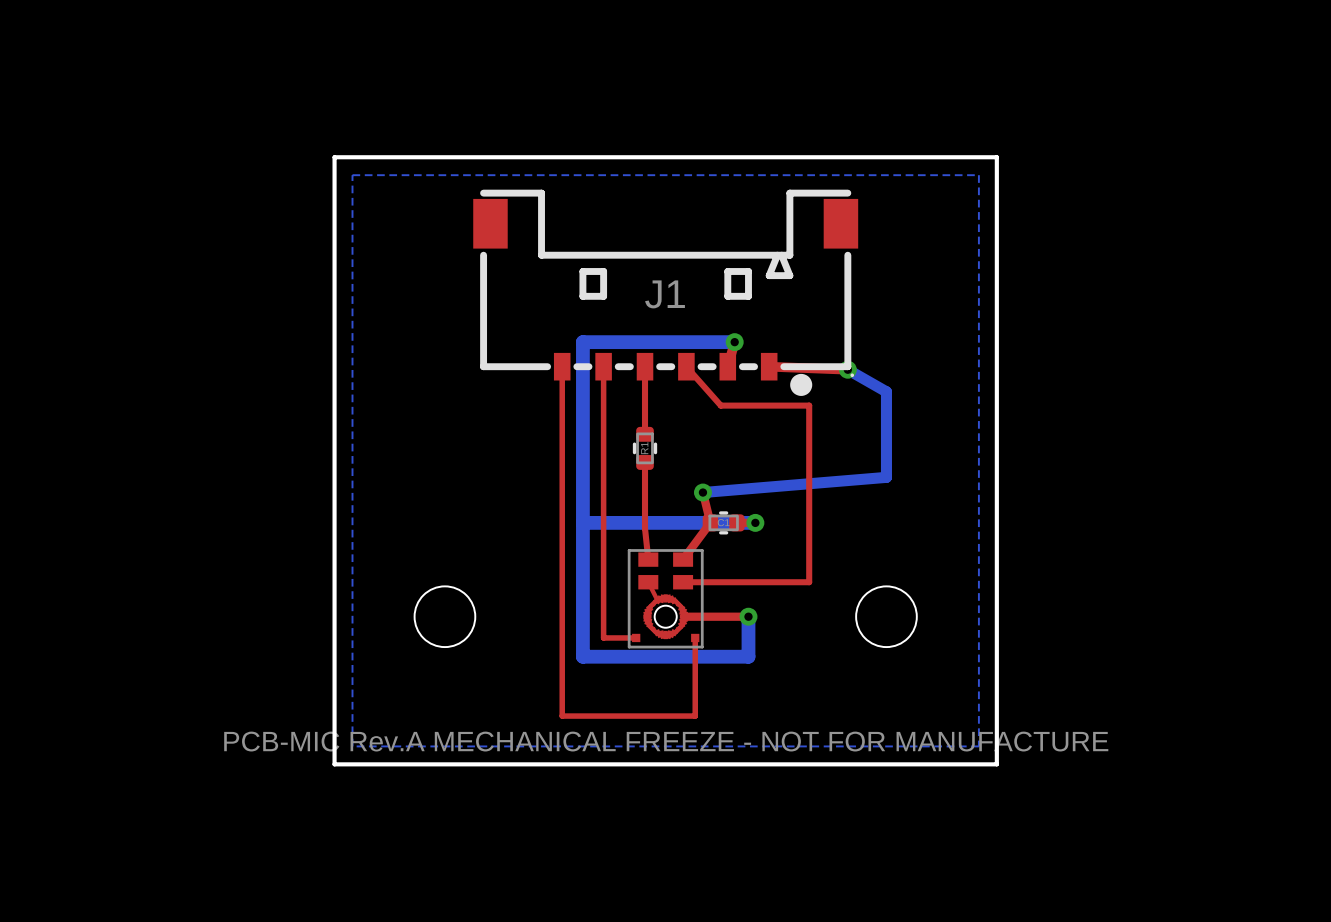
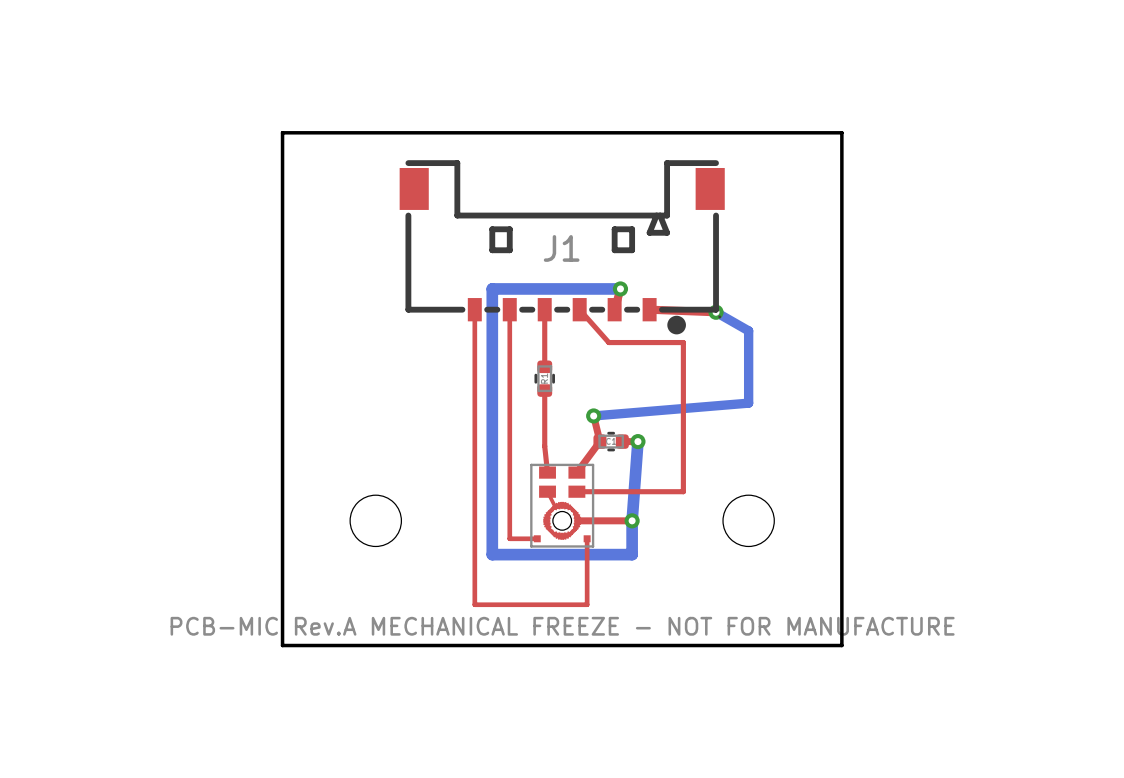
bottom zone outline: (352, 175) (978, 175) (978, 746) (352, 746) (352, 175) -> none
bottom track: (582, 522) (755, 522) -> (632, 520) (637, 441)

